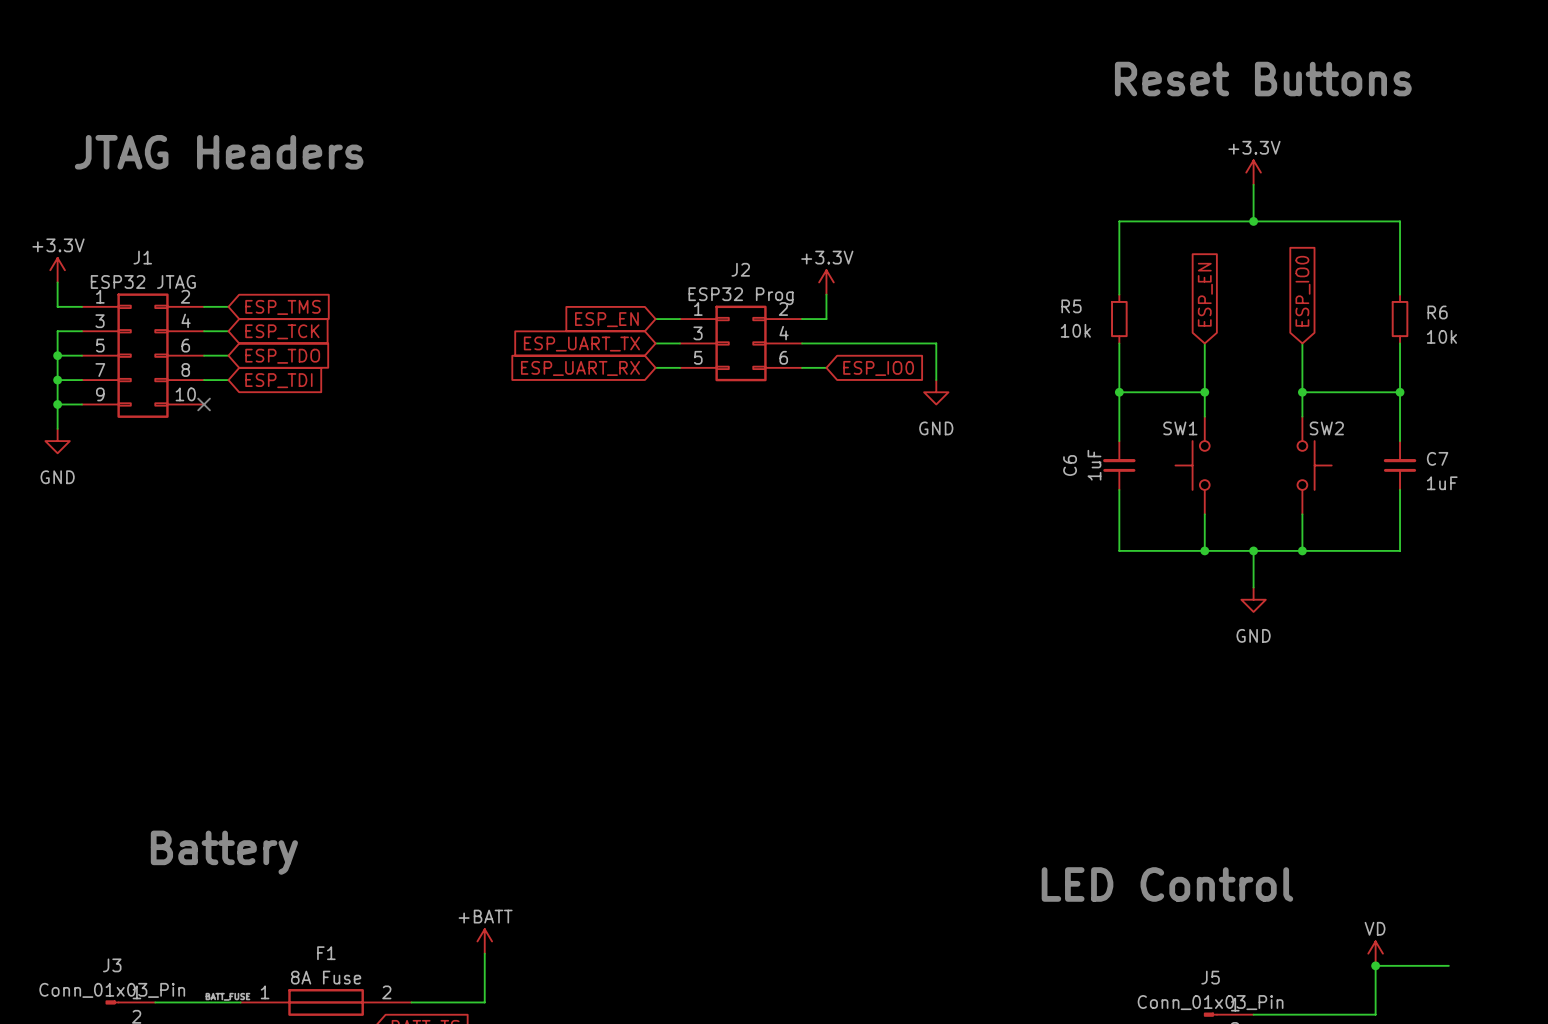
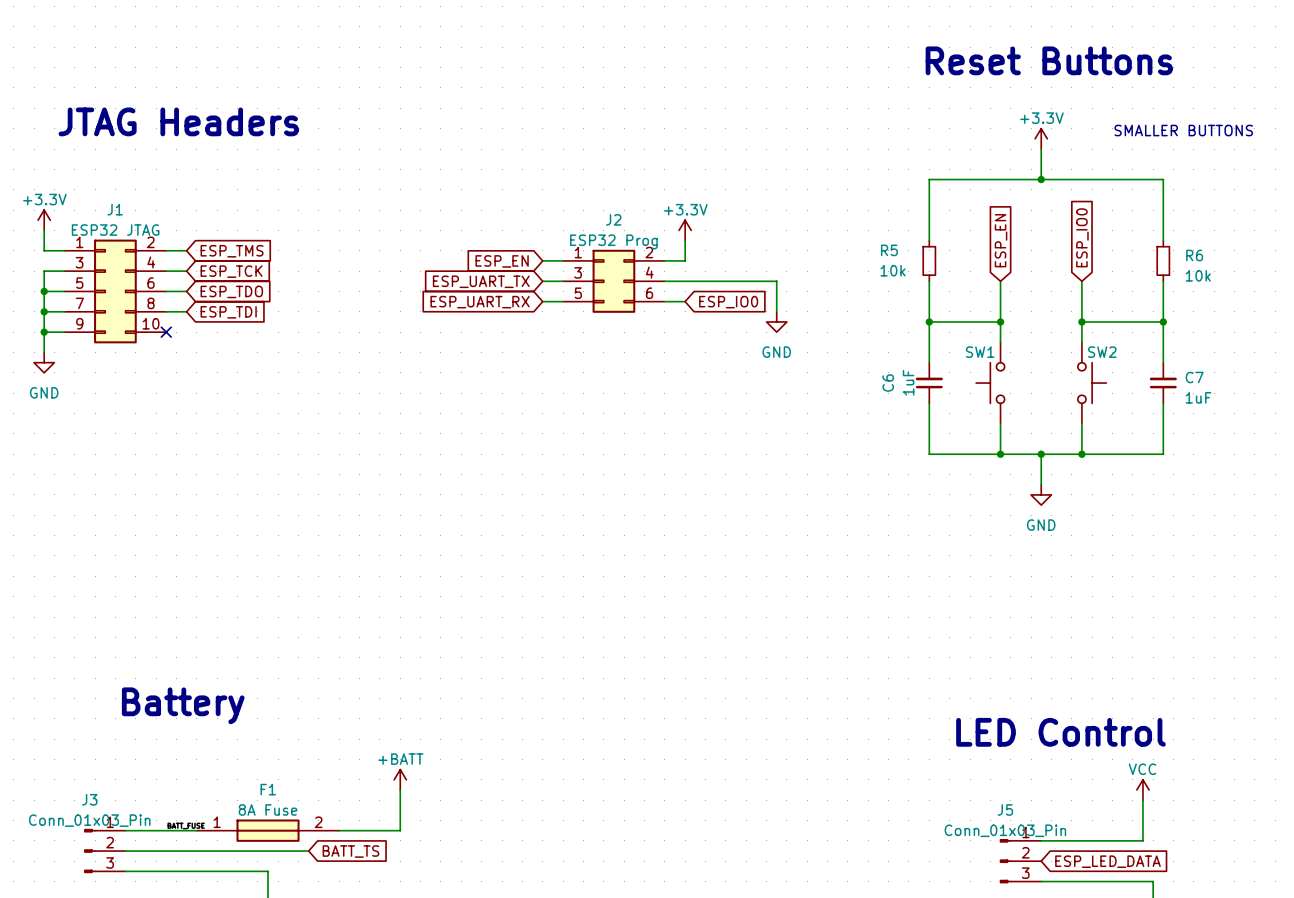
text: none -> SMALLER BUTTONS (1183, 130)
text position: LED Control (1167, 884) -> LED Control (1060, 732)
power symbol: VD (1375, 953) -> VCC (1142, 789)
wire: (1375, 965) (1448, 965) -> none
junction: (1375, 965) -> none

